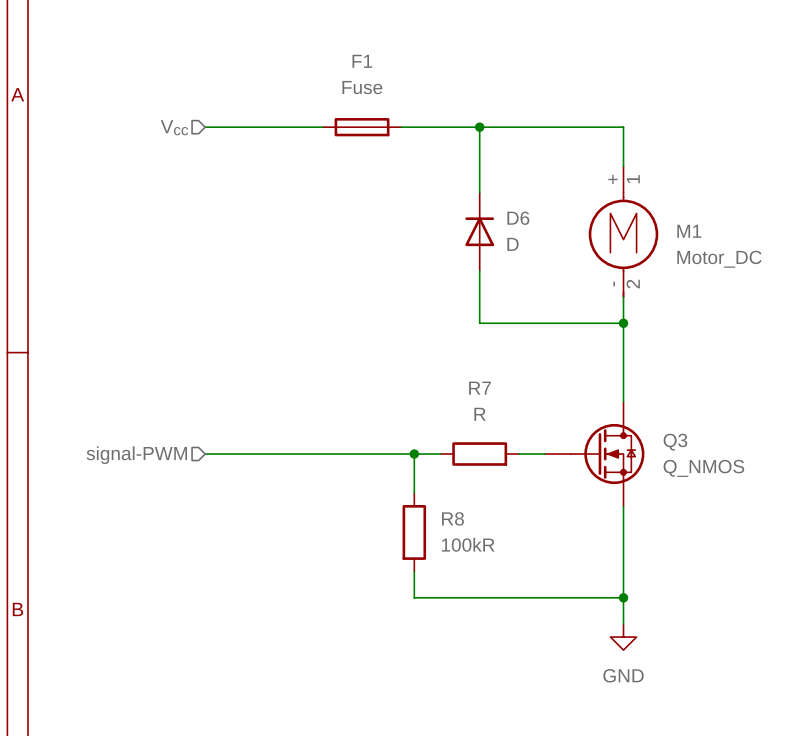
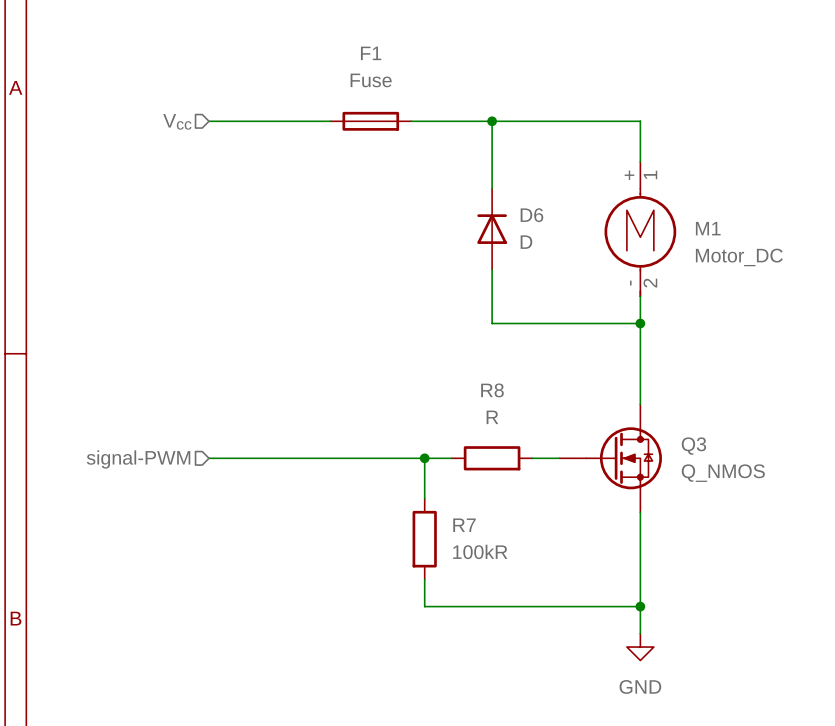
R7 name: R7 (479, 388) -> R8 (492, 390)
R8 name: R8 (452, 518) -> R7 (464, 525)

